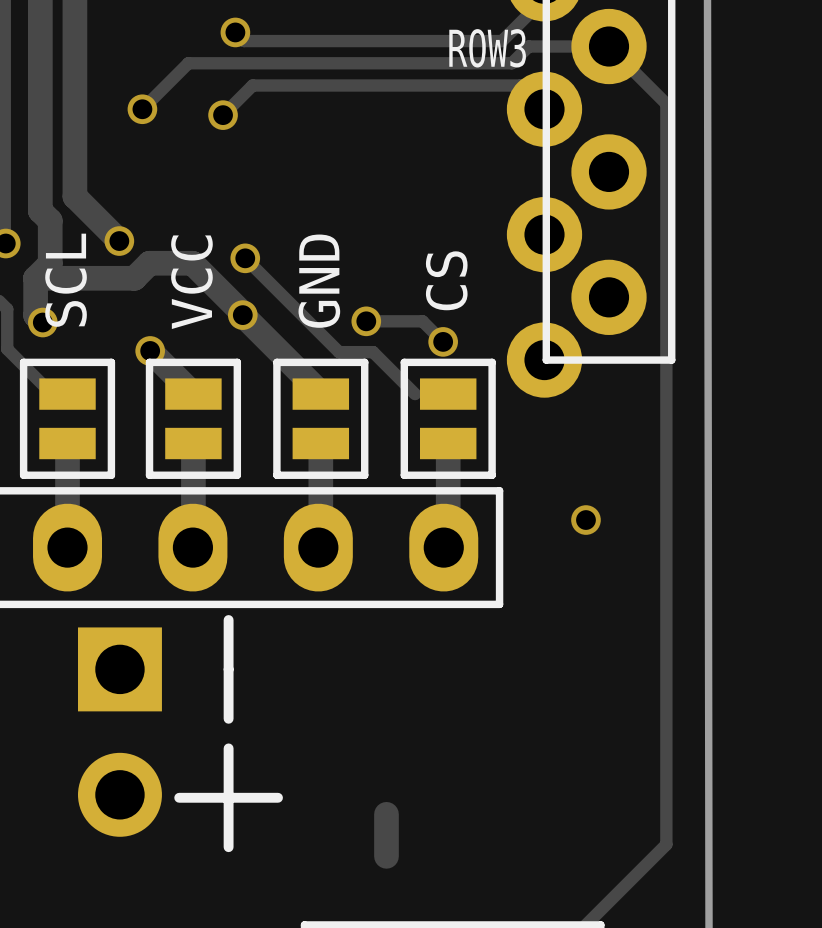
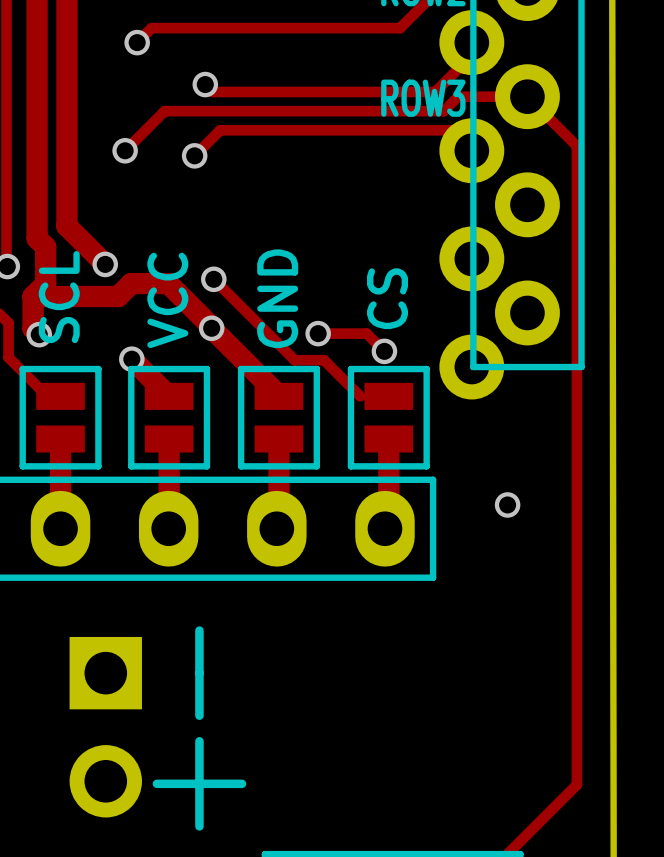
part position: (180, 733) -> (157, 728)
track: (386, 814) (386, 856) -> none

